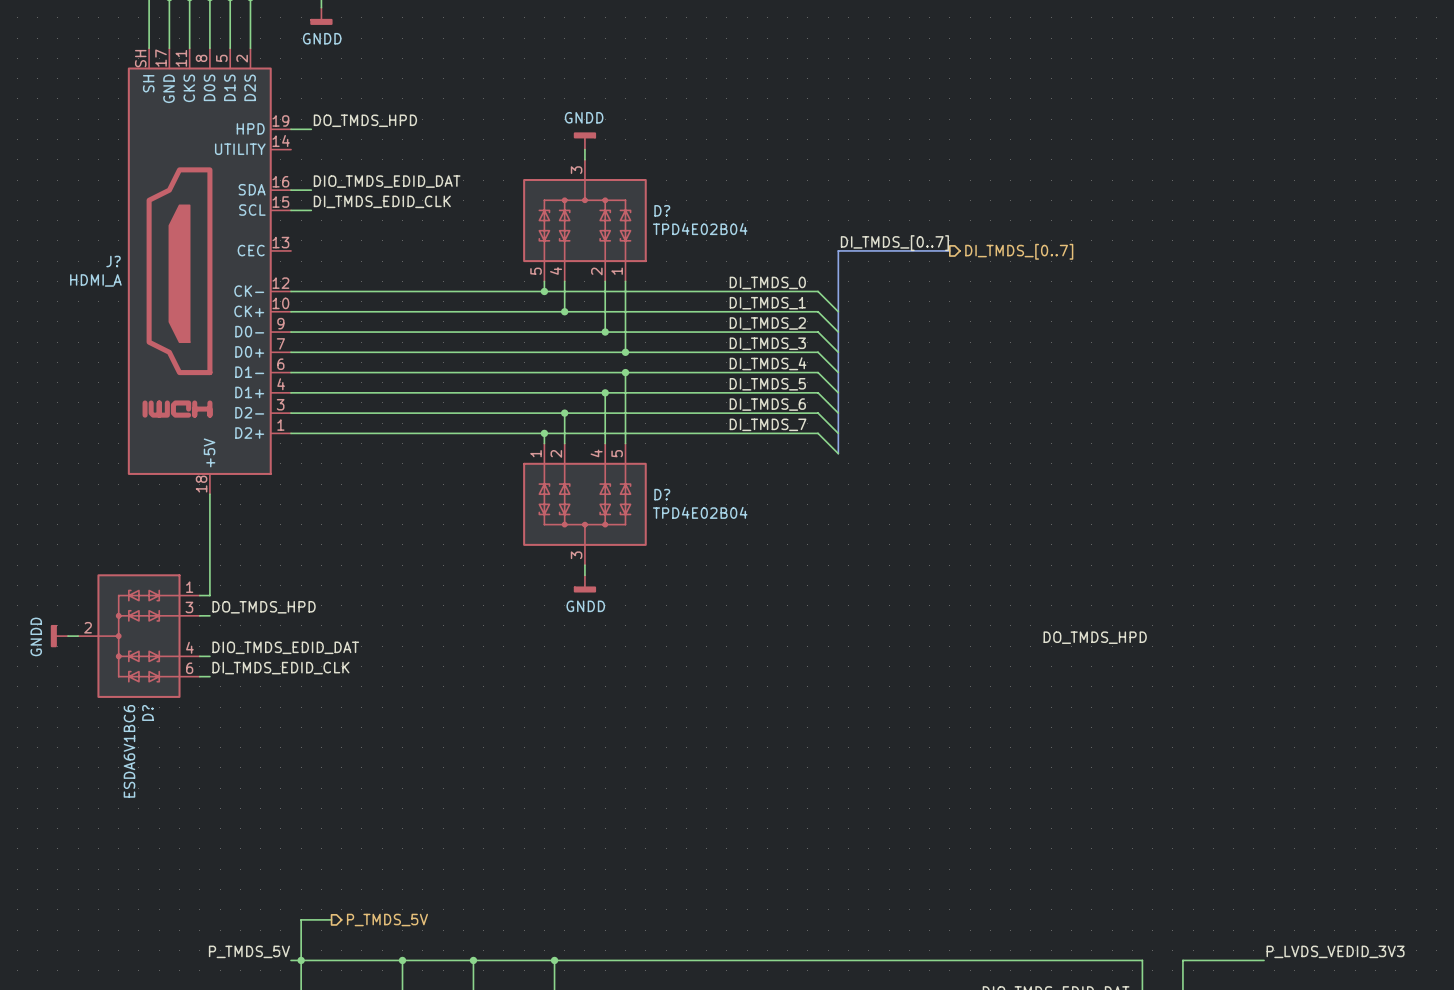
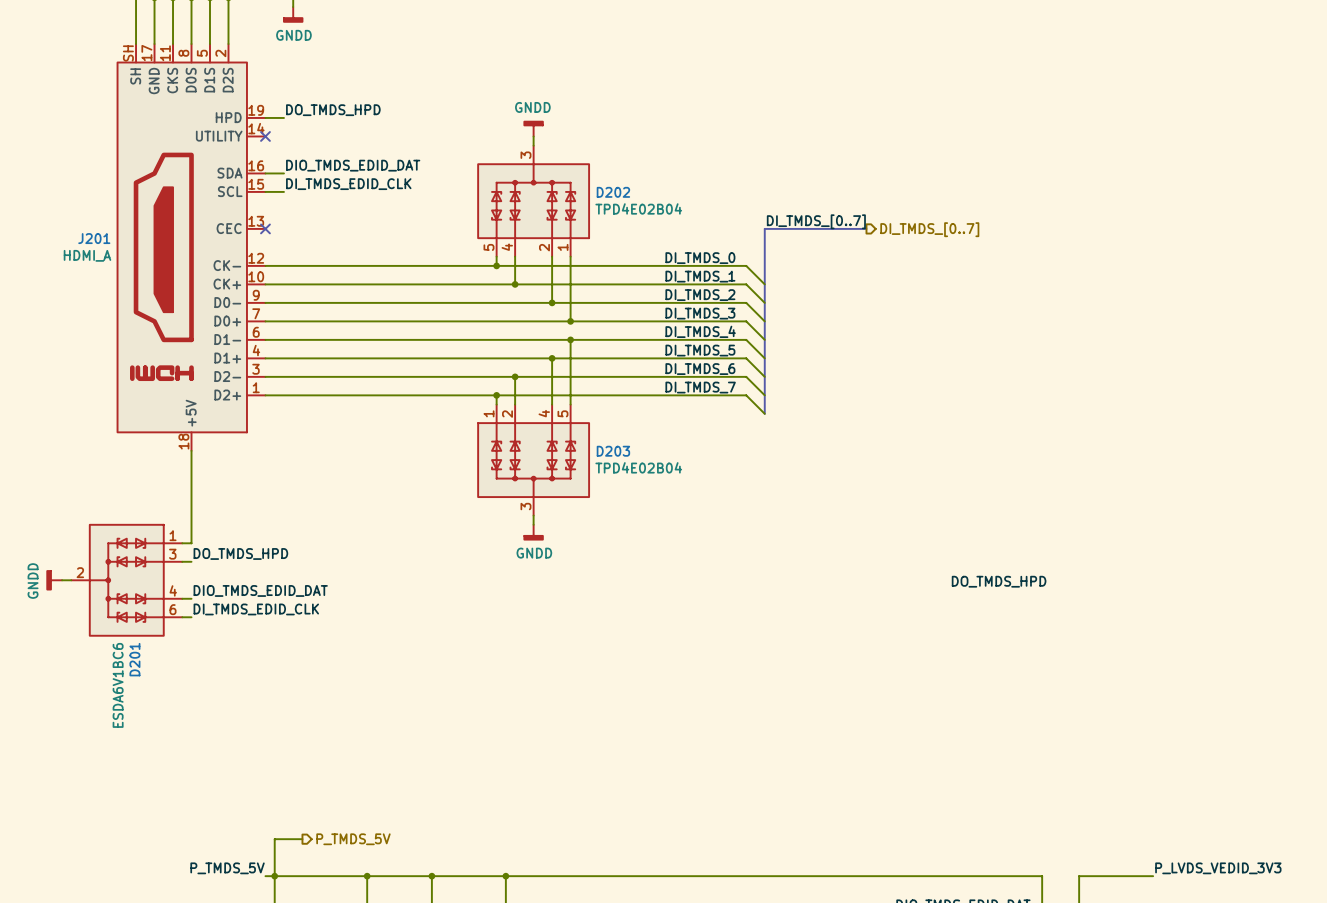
no-connect mark: none -> (265, 136)
D? name: D? (662, 210) -> D202 (613, 192)
no-connect mark: none -> (265, 228)
J? name: J? (113, 261) -> J201 (94, 238)
D? name: D? (662, 494) -> D203 (613, 451)
D? name: D? (147, 712) -> D201 (134, 659)

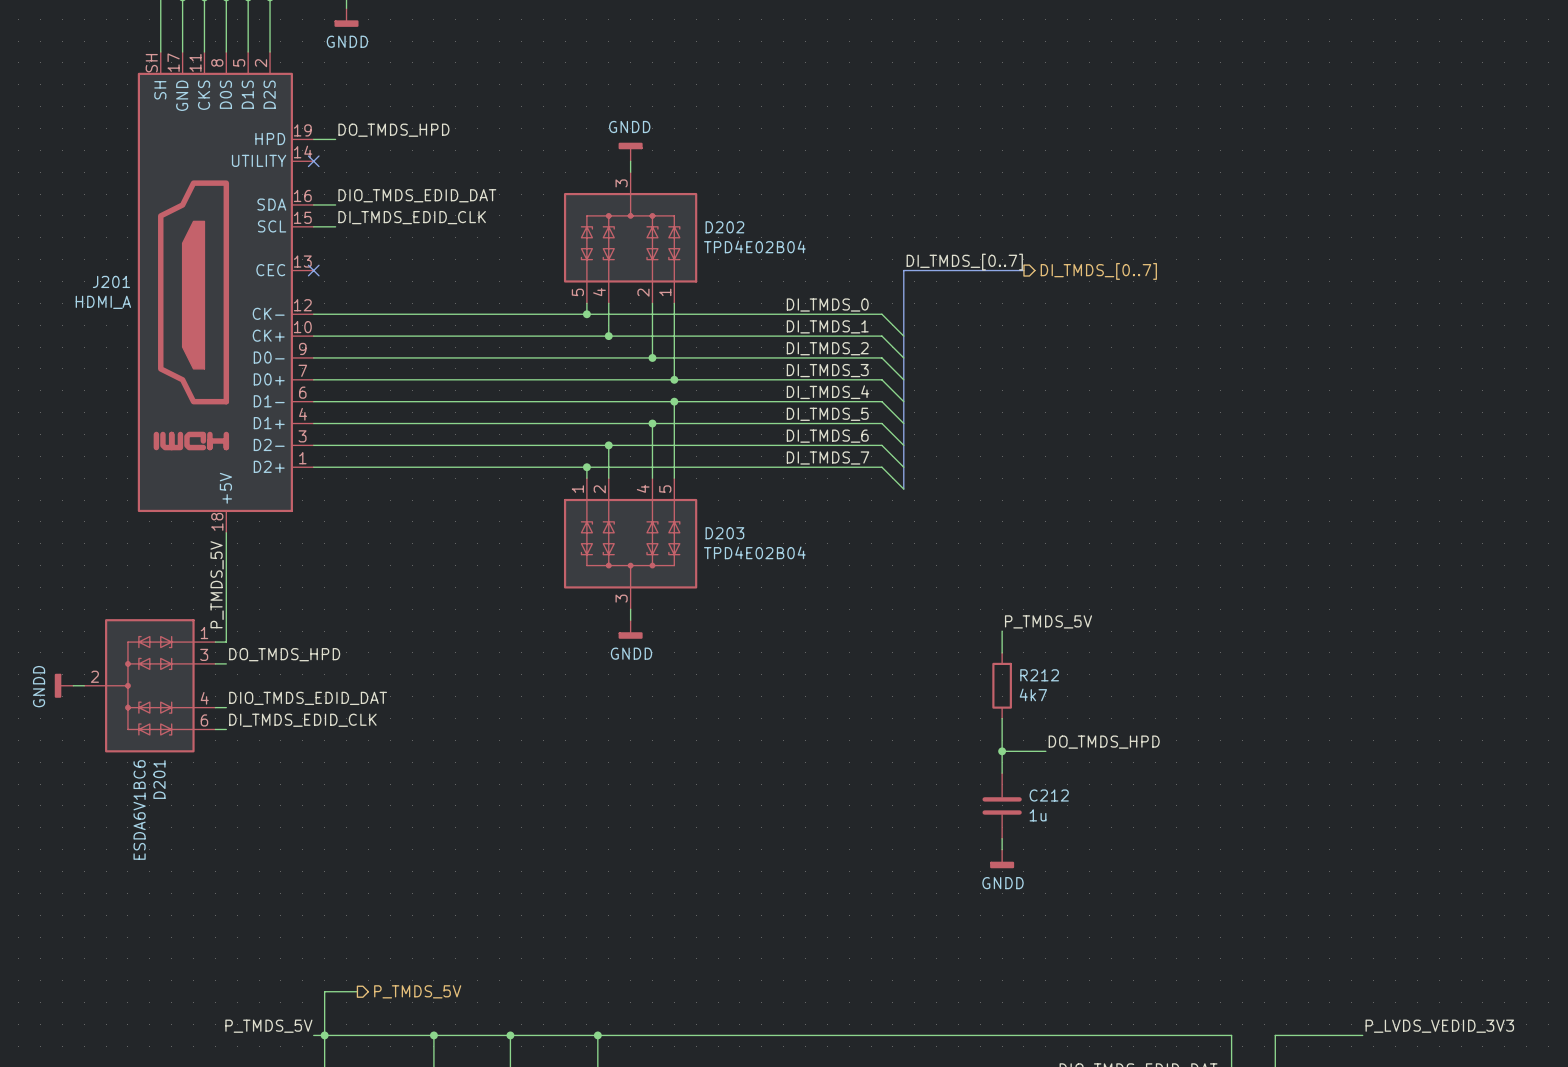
label: none -> P_TMDS_5V (217, 584)
label: none -> P_TMDS_5V (1048, 621)
wire: none -> (1002, 631) (1002, 652)
R212: none -> 4k7 (1002, 685)
label position: DO_TMDS_HPD (999, 581) -> DO_TMDS_HPD (1104, 742)
wire: none -> (1002, 718) (1002, 773)
wire: none -> (1002, 751) (1045, 751)
junction: none -> (1002, 751)
C212: none -> 1u (1002, 805)
wire: none -> (1002, 838) (1002, 849)
power symbol: none -> GNDD (1002, 858)

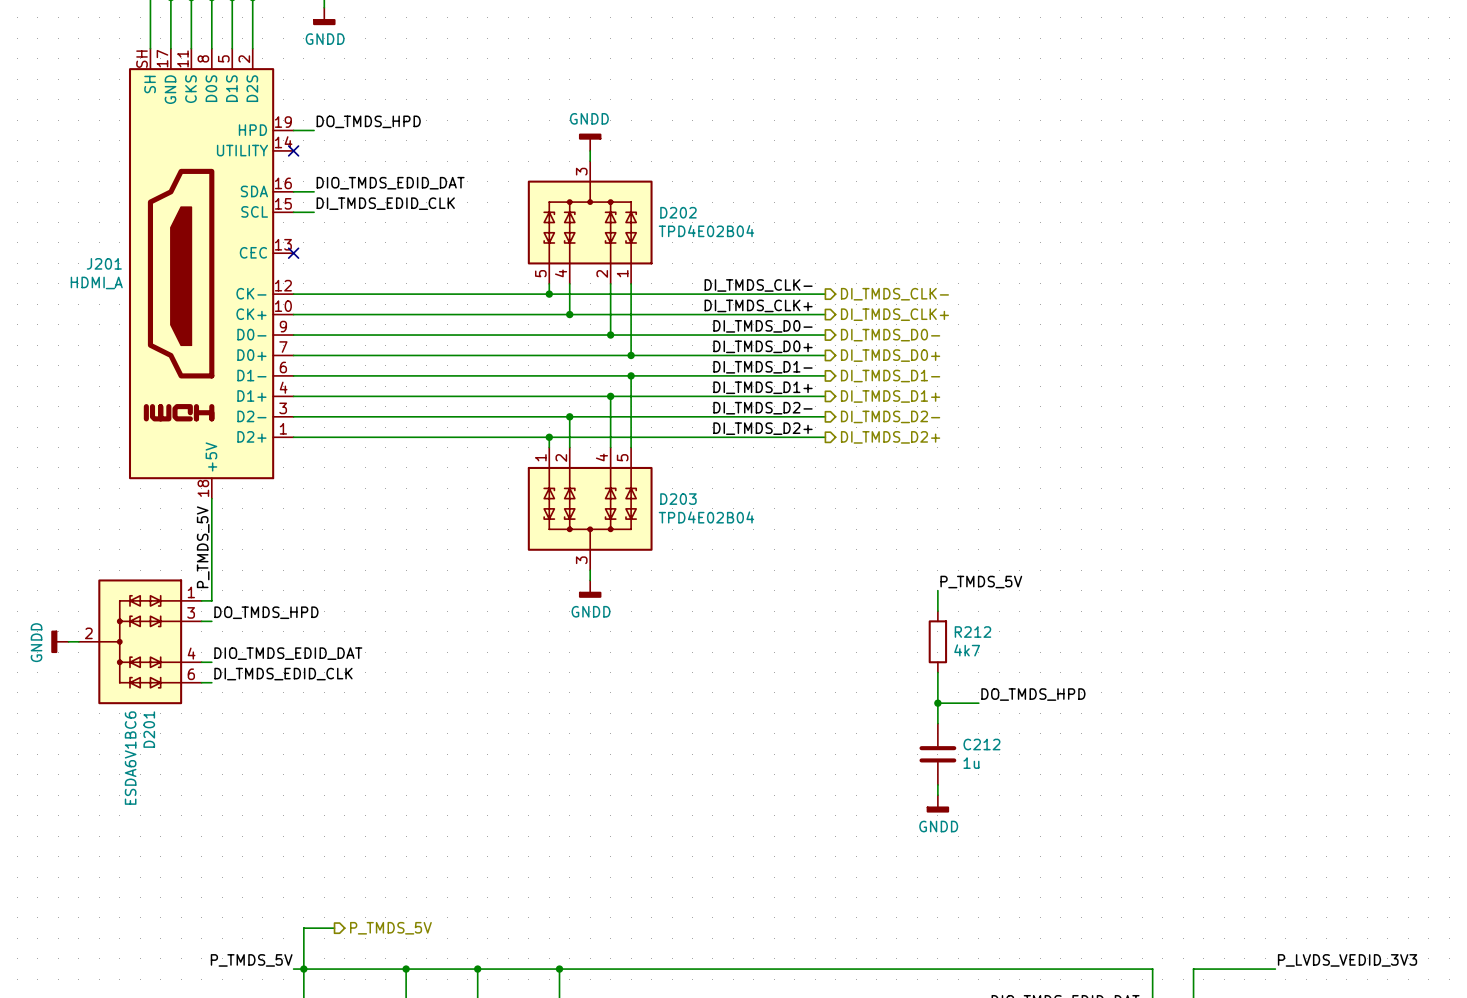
label: DI_TMDS_[0..7] (964, 262) -> none
bus: (1023, 270) (903, 270) (903, 489) -> none
hierarchical label: DI_TMDS_[0..7] (1098, 271) -> none
label: DI_TMDS_0 (827, 305) -> DI_TMDS_CLK- (758, 285)
wire: (881, 314) (903, 336) -> none
hierarchical label: none -> DI_TMDS_CLK- (894, 294)
label: DI_TMDS_1 (827, 326) -> DI_TMDS_CLK+ (758, 305)
wire: (881, 336) (903, 357) -> none
hierarchical label: none -> DI_TMDS_CLK+ (894, 314)
label: DI_TMDS_2 (827, 348) -> DI_TMDS_D0- (762, 326)
wire: (881, 357) (903, 379) -> none
hierarchical label: none -> DI_TMDS_D0- (890, 335)
label: DI_TMDS_3 (827, 370) -> DI_TMDS_D0+ (762, 346)
wire: (881, 379) (903, 401) -> none
hierarchical label: none -> DI_TMDS_D0+ (890, 355)
label: DI_TMDS_4 (827, 392) -> DI_TMDS_D1- (762, 367)
wire: (881, 401) (903, 423) -> none
hierarchical label: none -> DI_TMDS_D1- (890, 376)
label: DI_TMDS_5 (827, 414) -> DI_TMDS_D1+ (762, 387)
wire: (881, 423) (903, 445) -> none
hierarchical label: none -> DI_TMDS_D1+ (890, 396)
label: DI_TMDS_6 (827, 436) -> DI_TMDS_D2- (762, 408)
wire: (881, 445) (903, 467) -> none
hierarchical label: none -> DI_TMDS_D2- (890, 416)
label: DI_TMDS_7 (827, 458) -> DI_TMDS_D2+ (762, 428)
wire: (881, 467) (903, 489) -> none
hierarchical label: none -> DI_TMDS_D2+ (890, 437)

